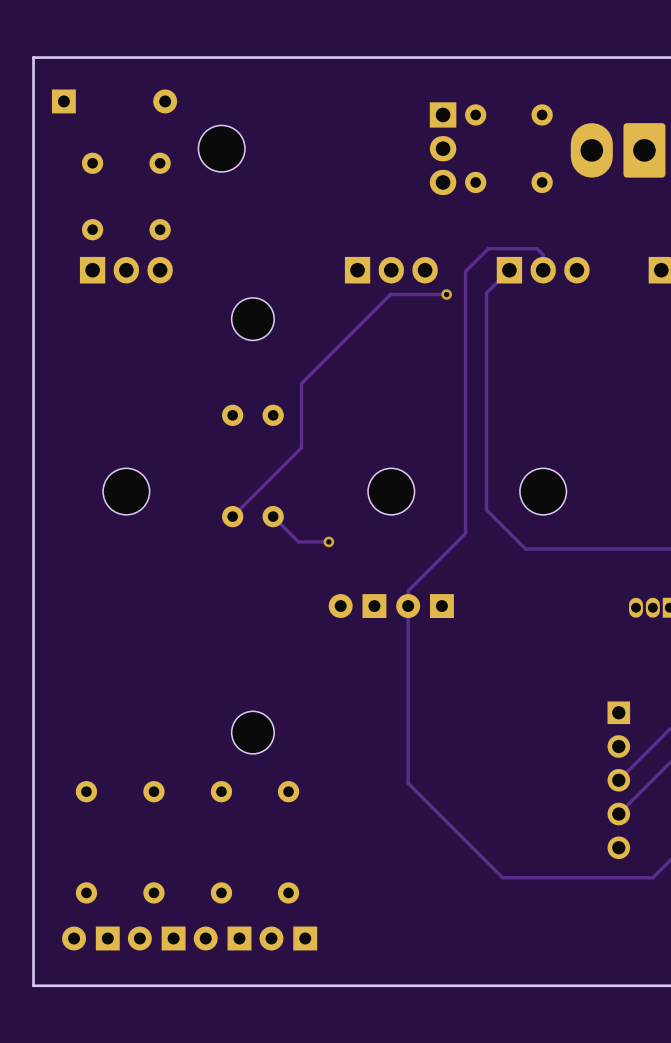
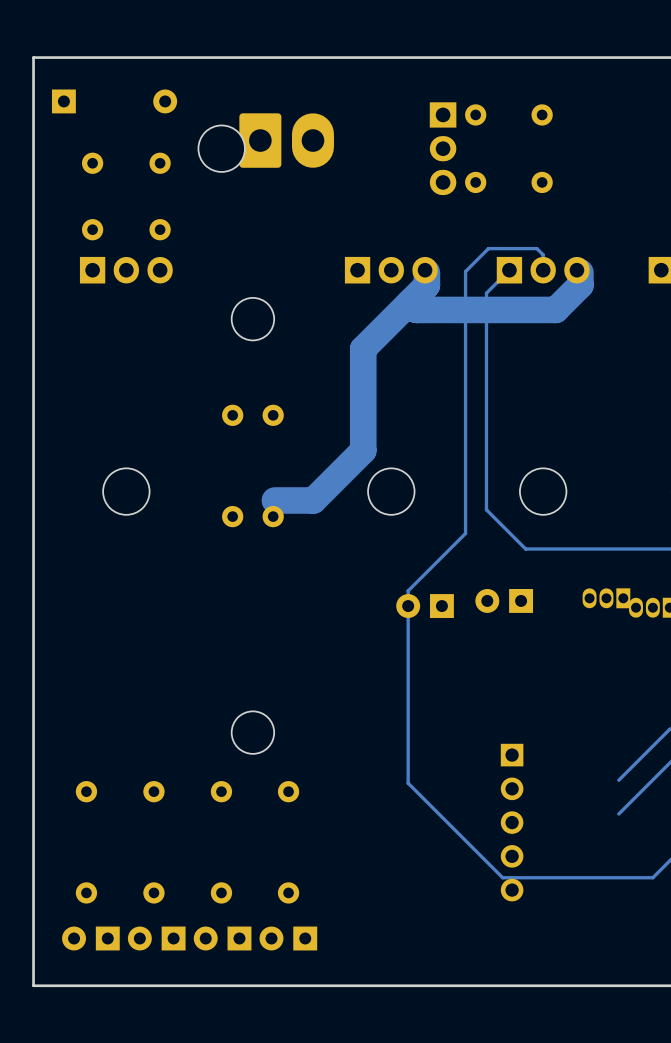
part: none -> (286, 140)
part: (618, 150) -> none
track: none -> (426, 272) (426, 285) (363, 348) (363, 450) (313, 500) (274, 500)
track: none -> (580, 272) (580, 285) (555, 309) (416, 309) (409, 302)
track: (446, 294) (390, 294) (301, 383) (301, 447) (232, 516) -> none
via: (446, 294) -> none
track: (273, 516) (298, 541) (328, 541) -> none
via: (328, 541) -> none
part: none -> (606, 598)
part position: (357, 606) -> (504, 600)
part position: (618, 780) -> (512, 822)

